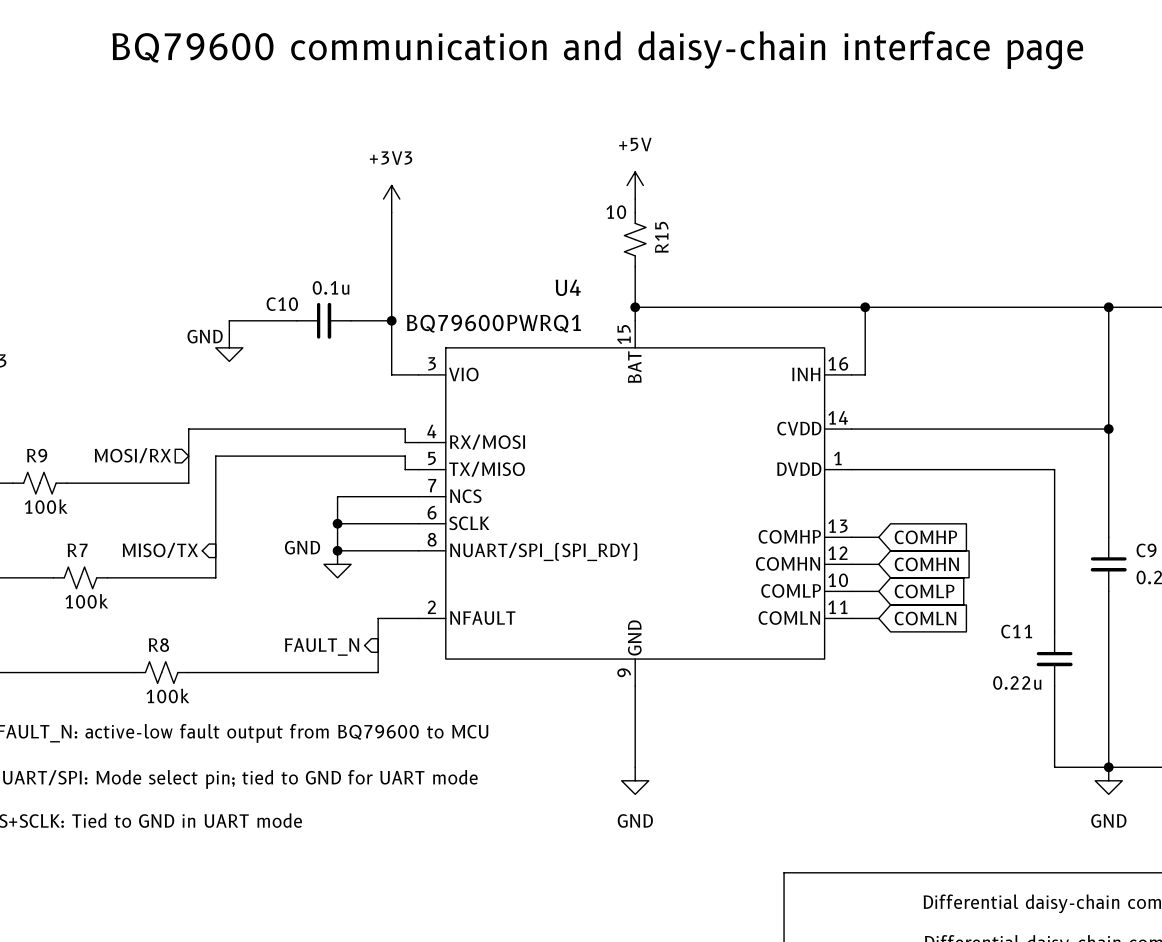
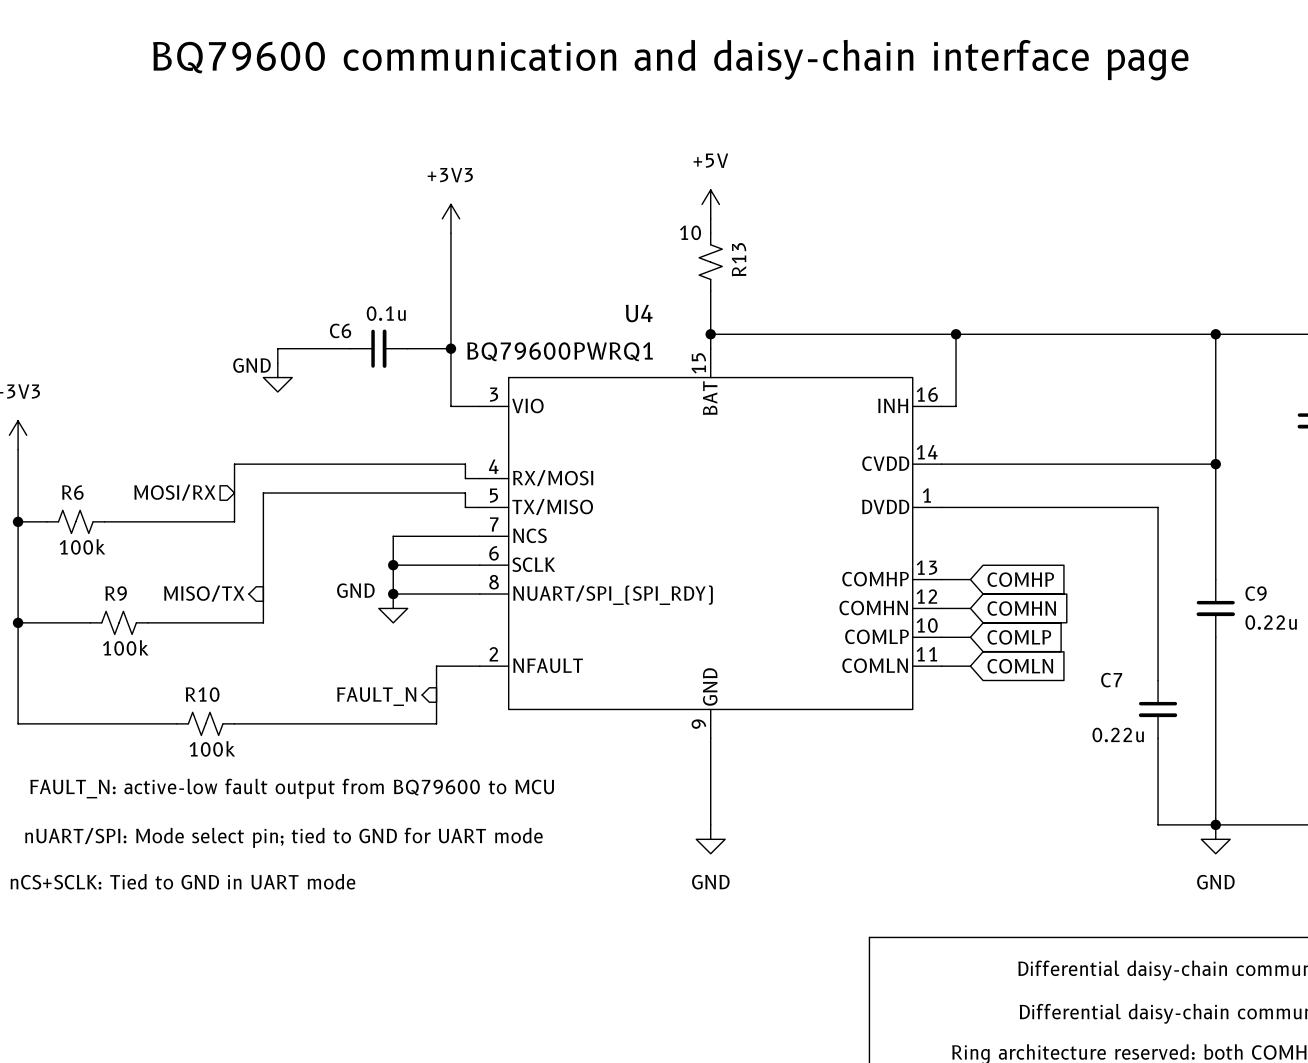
R15 name: R15 (661, 237) -> R13 (739, 259)
C10 name: C10 (282, 304) -> C6 (340, 330)
R9 name: R9 (37, 455) -> R6 (72, 492)
R7 name: R7 (77, 550) -> R9 (116, 593)
C11 name: C11 (1016, 631) -> C7 (1111, 680)
R8 name: R8 (158, 645) -> R10 (202, 694)

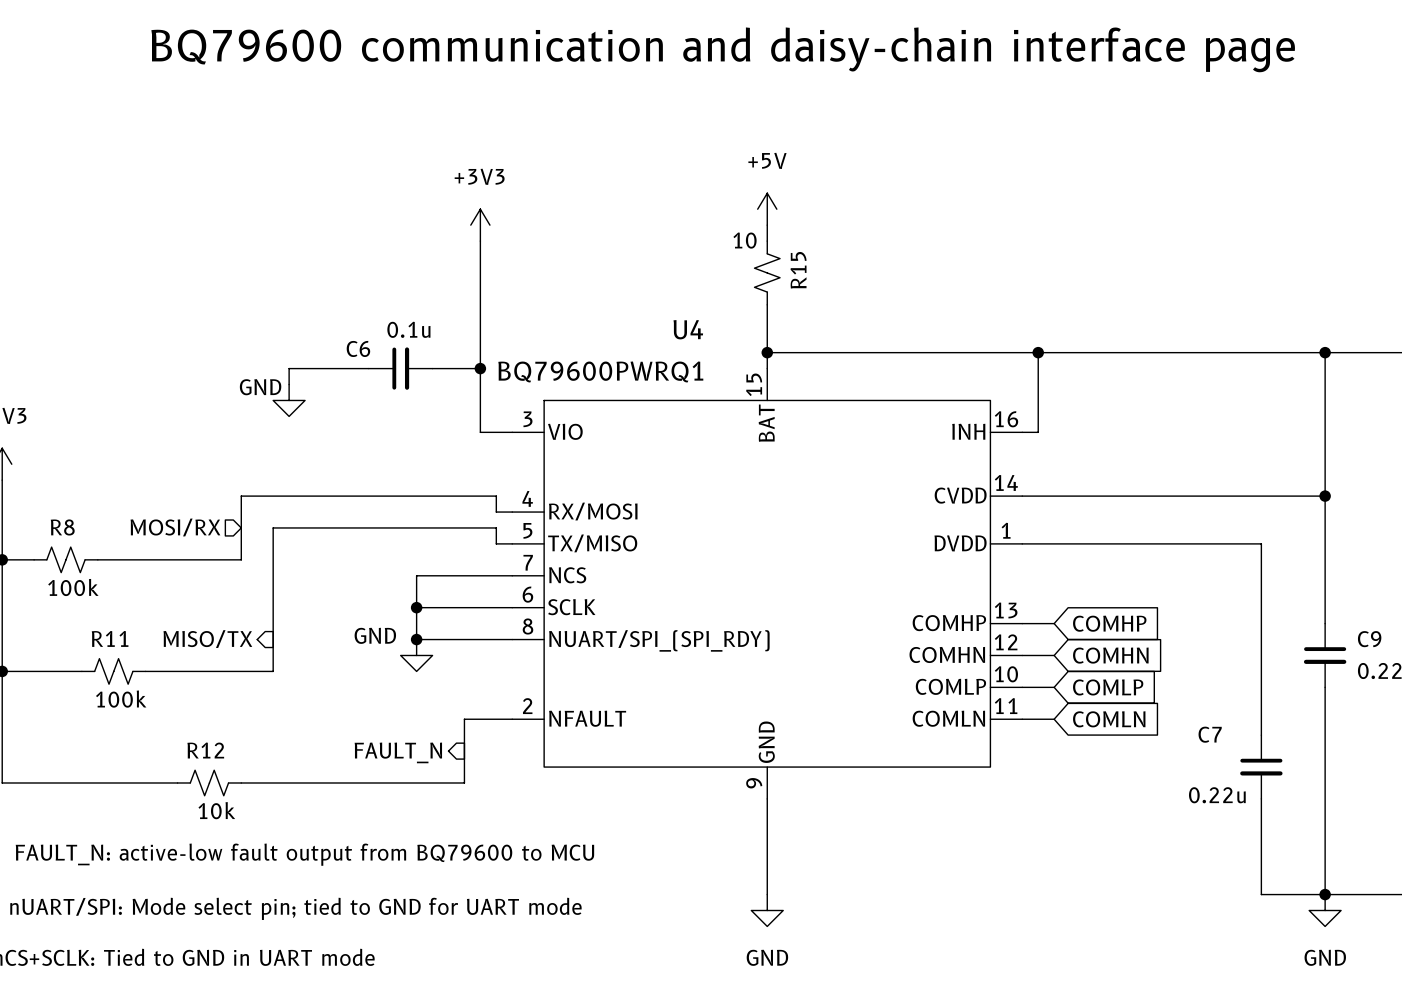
R13 name: R13 (739, 259) -> R15 (798, 270)
R6 name: R6 (72, 492) -> R8 (62, 527)
R9 name: R9 (116, 593) -> R11 (110, 638)
R10 name: R10 (202, 694) -> R12 (205, 750)
R10 value: 100k (212, 748) -> 10k (216, 810)

